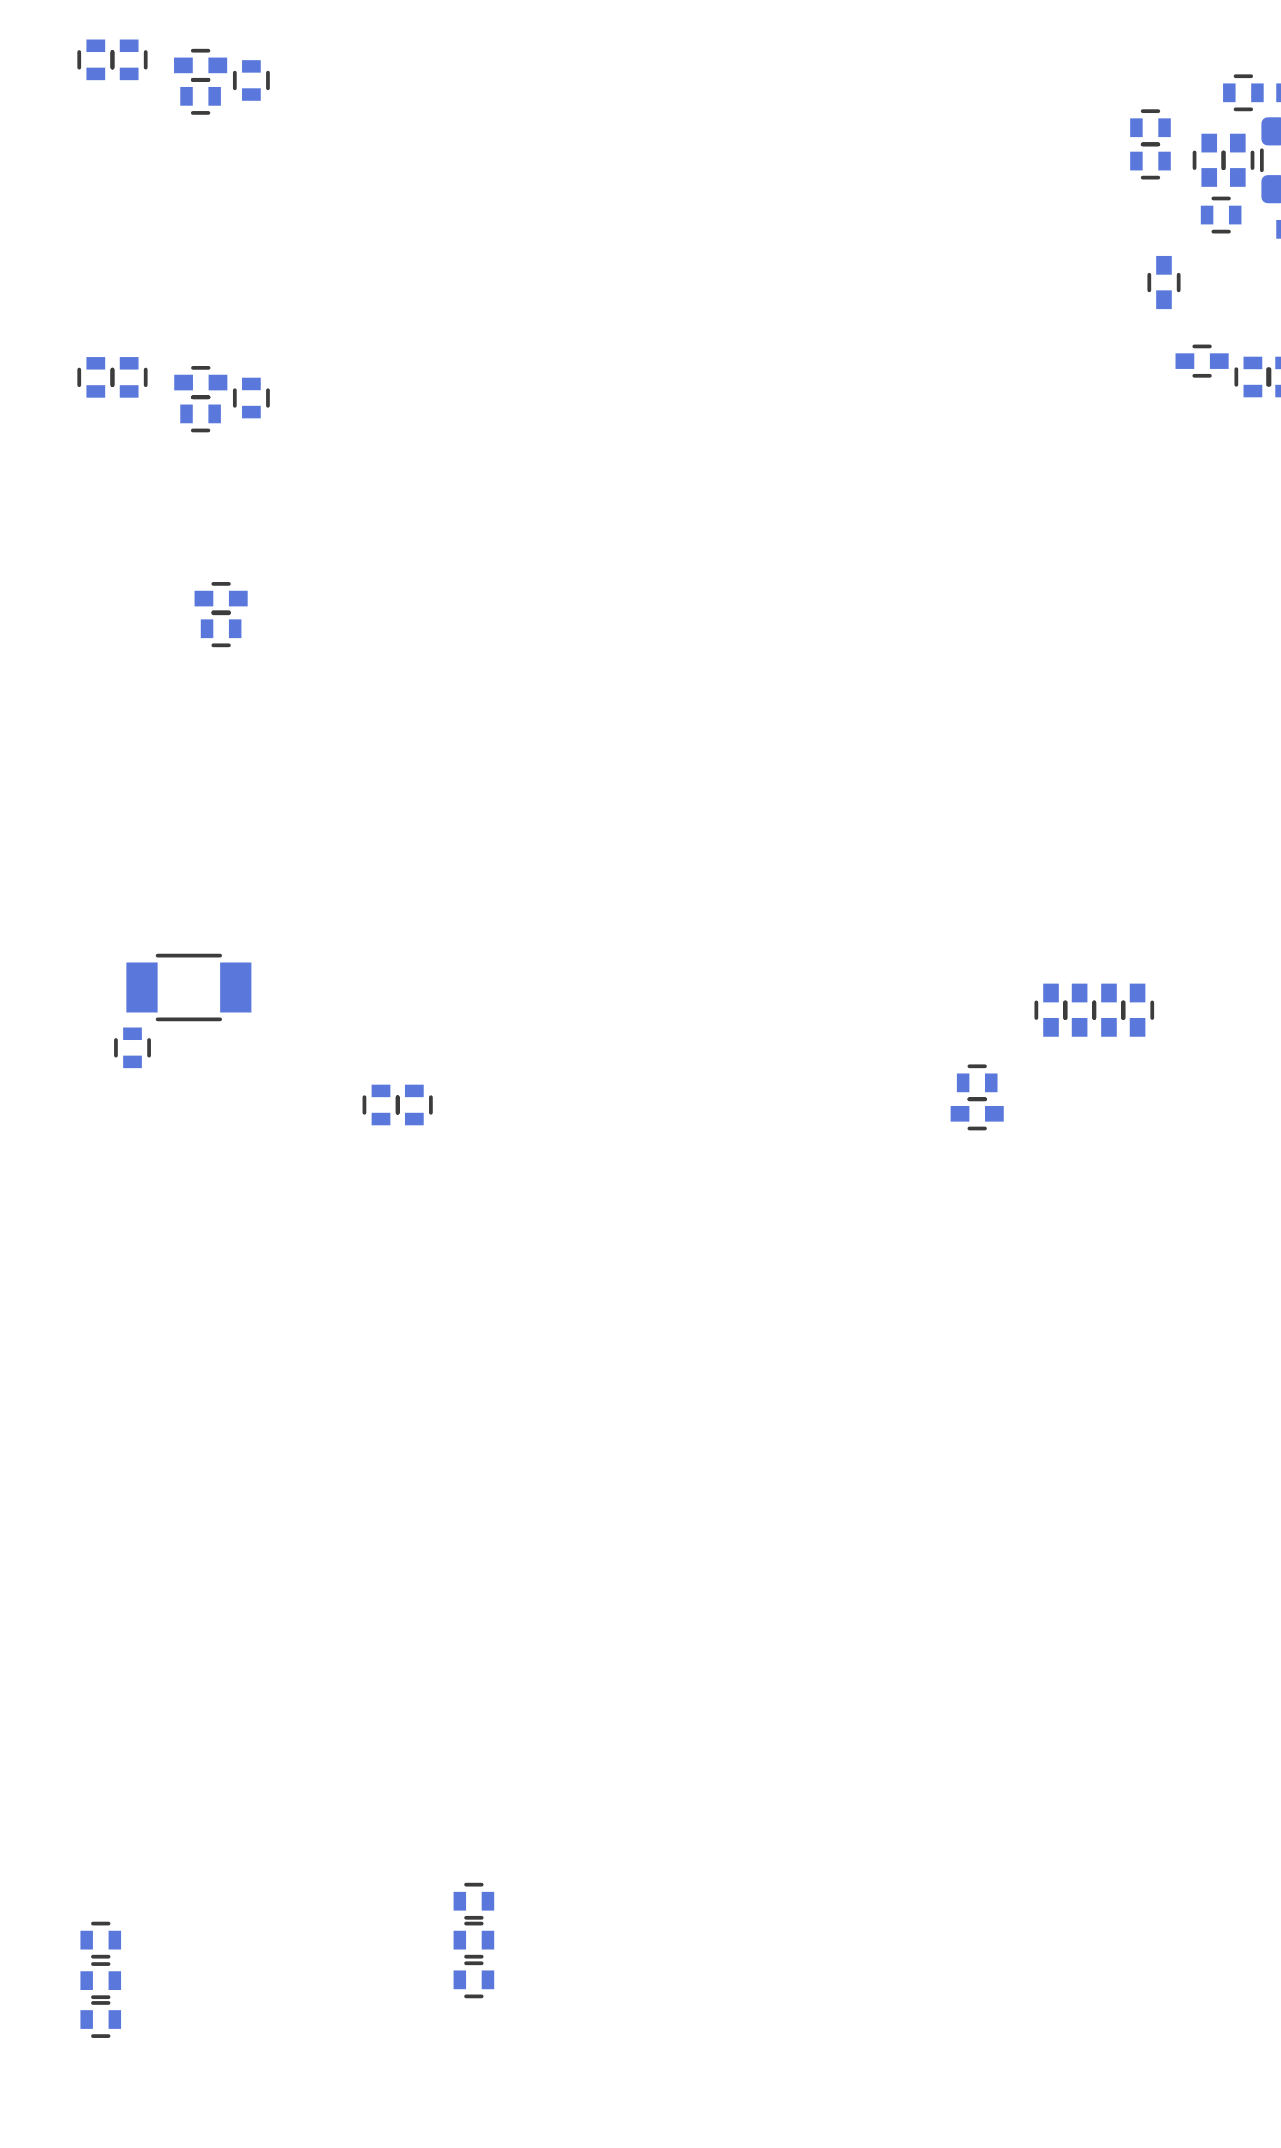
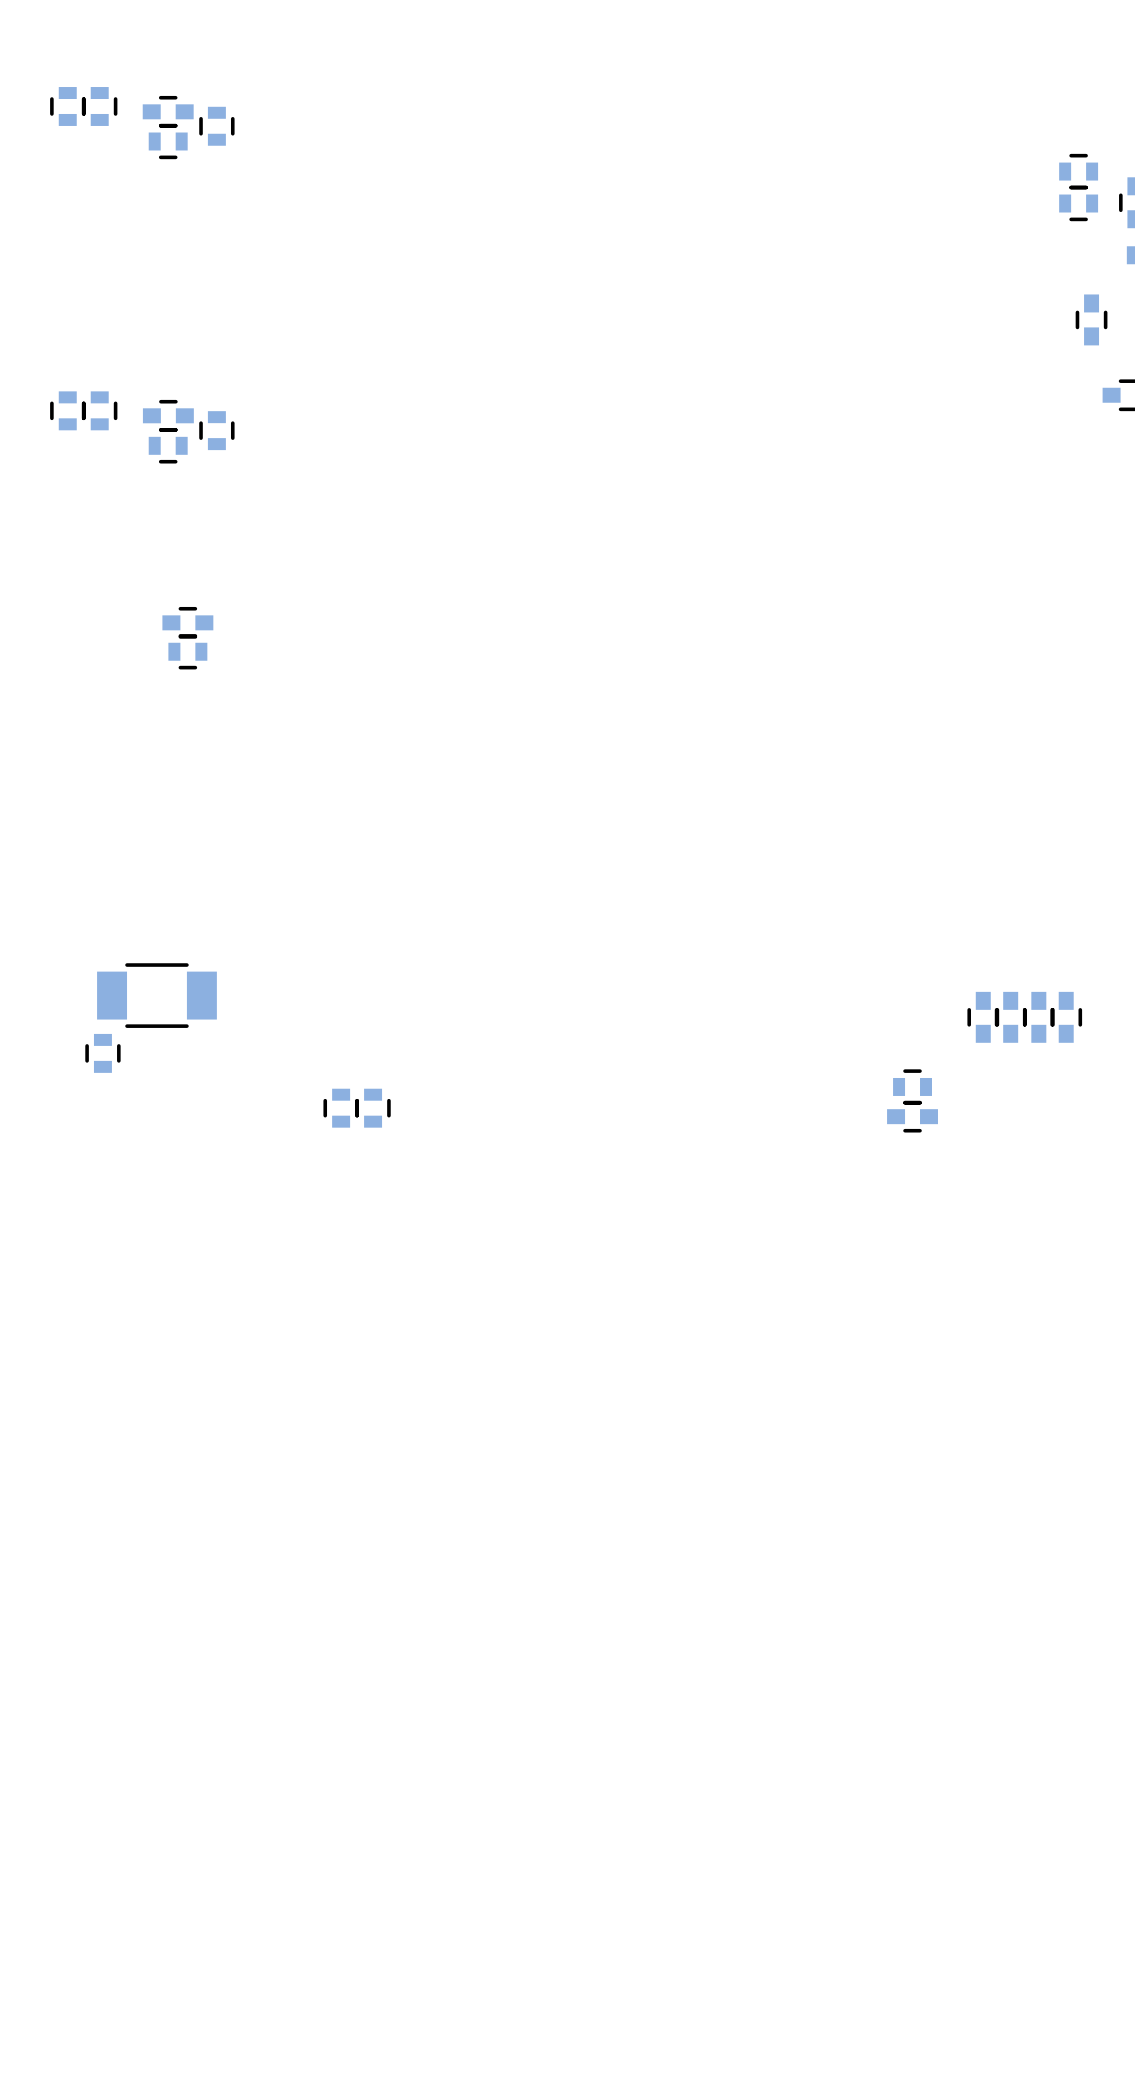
part: (473, 1901) -> none
part: (100, 1940) -> none
part: (473, 1940) -> none
part: (473, 1979) -> none
part: (100, 1980) -> none
part: (100, 2019) -> none

